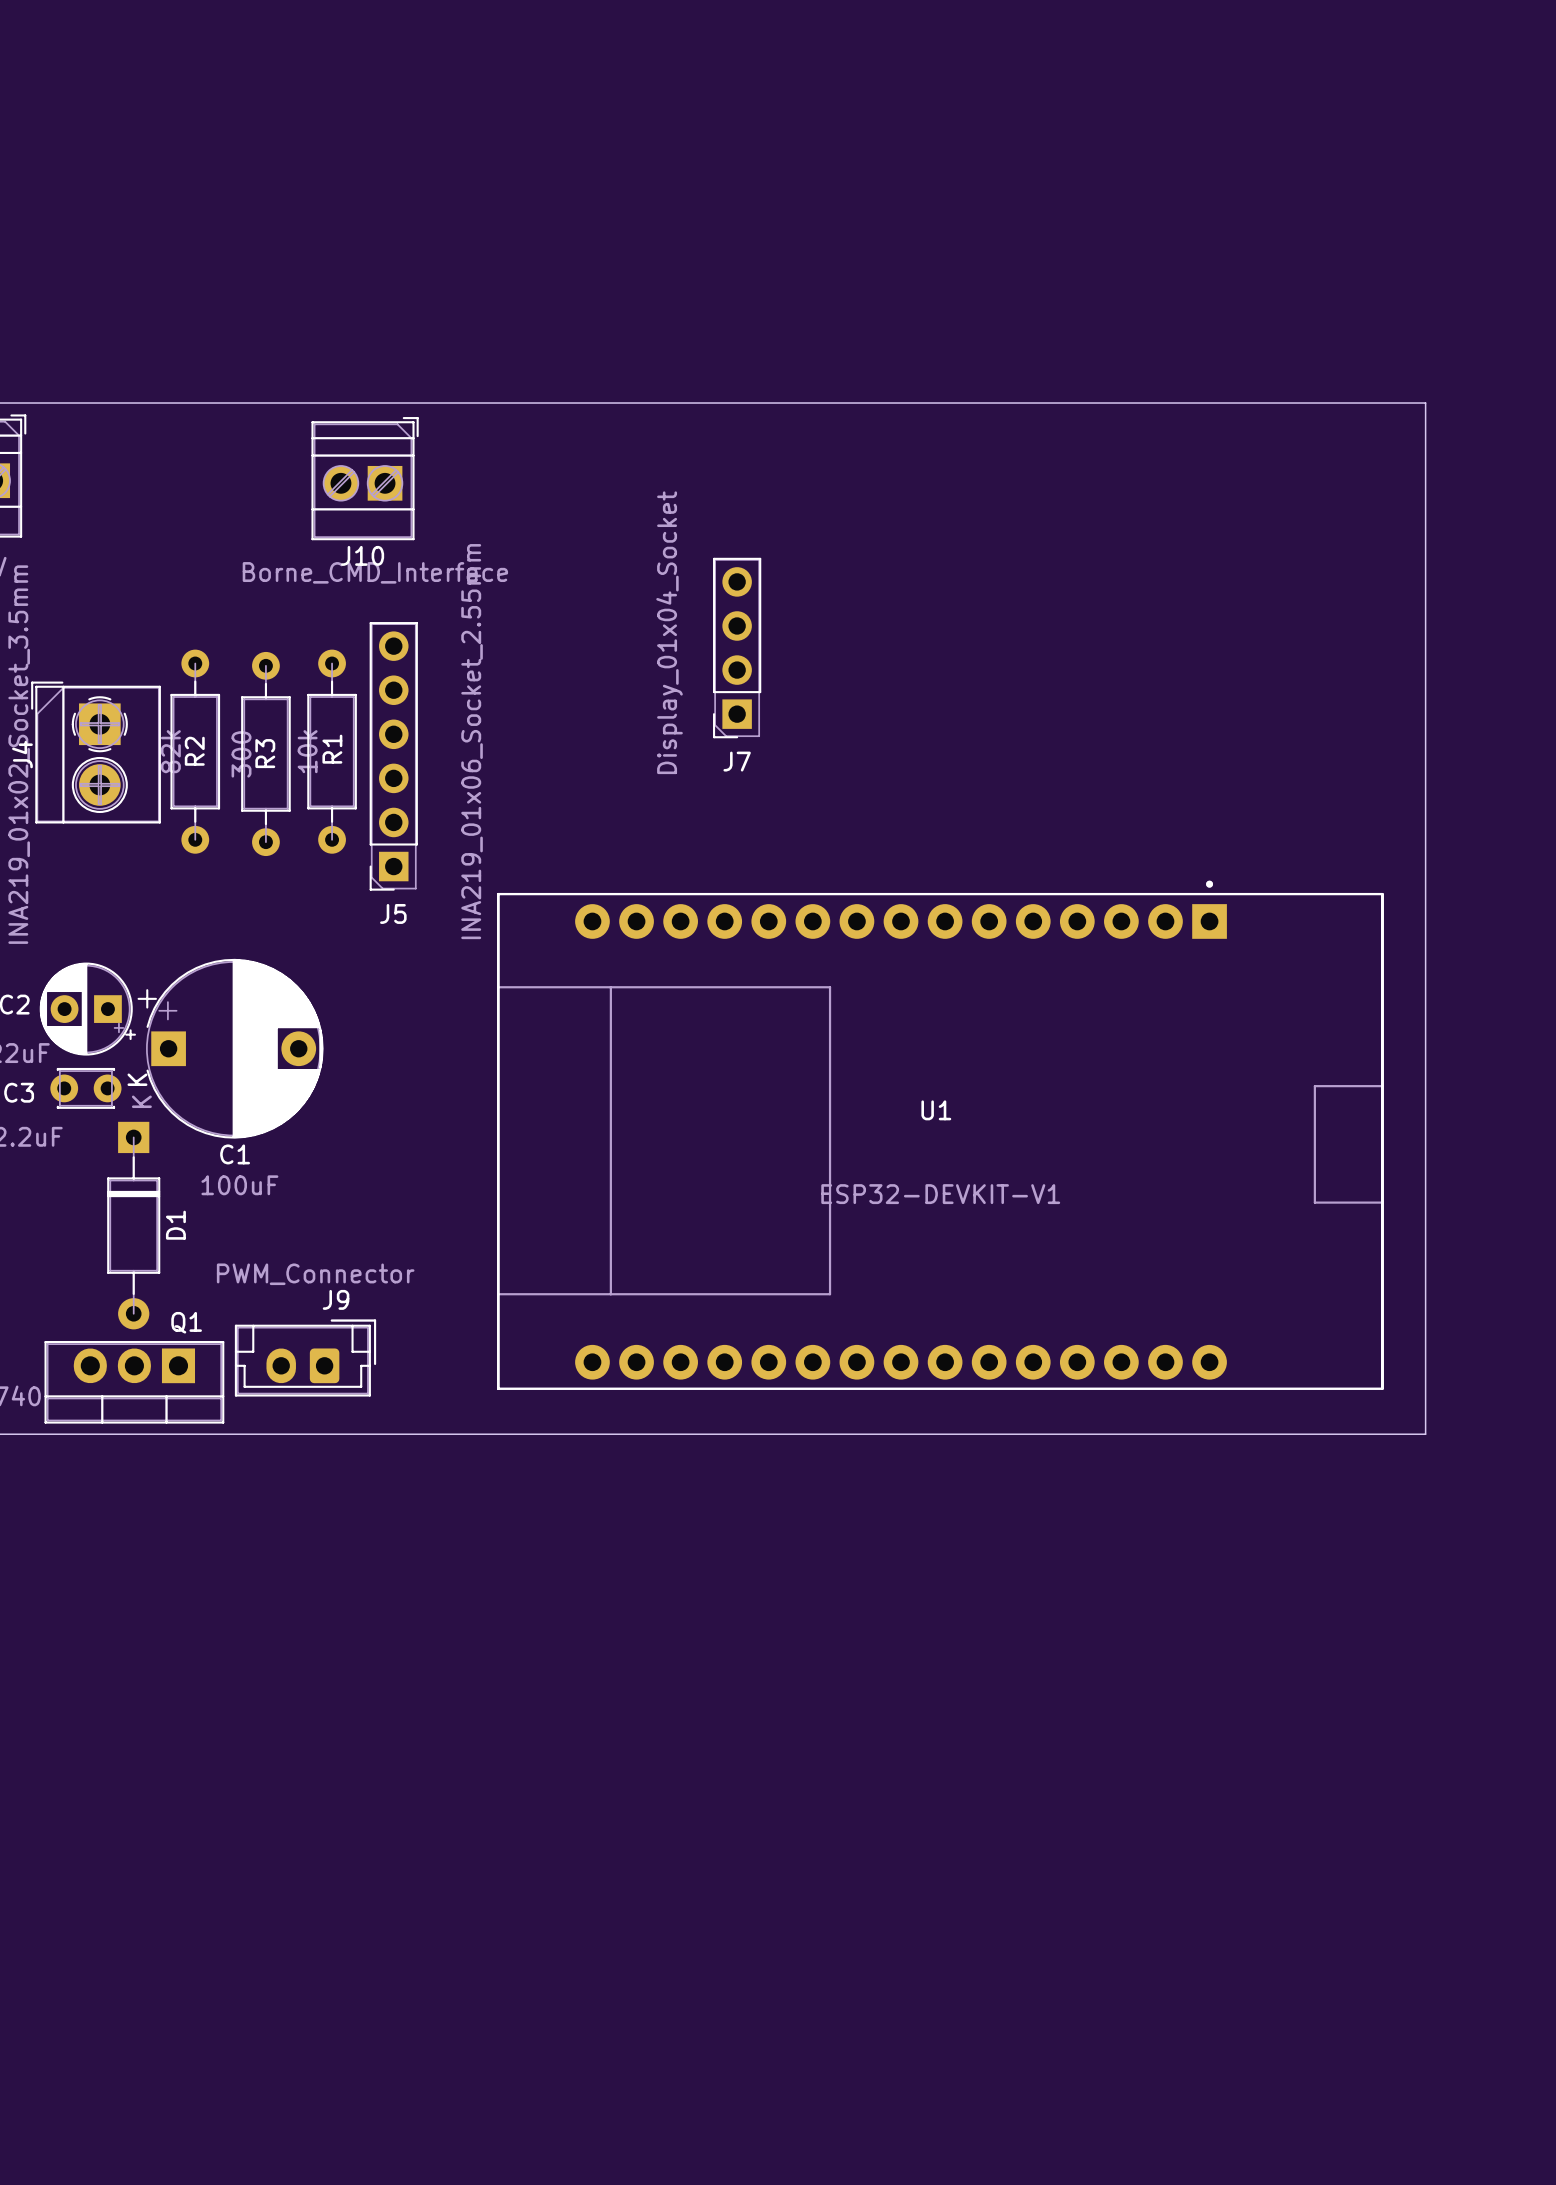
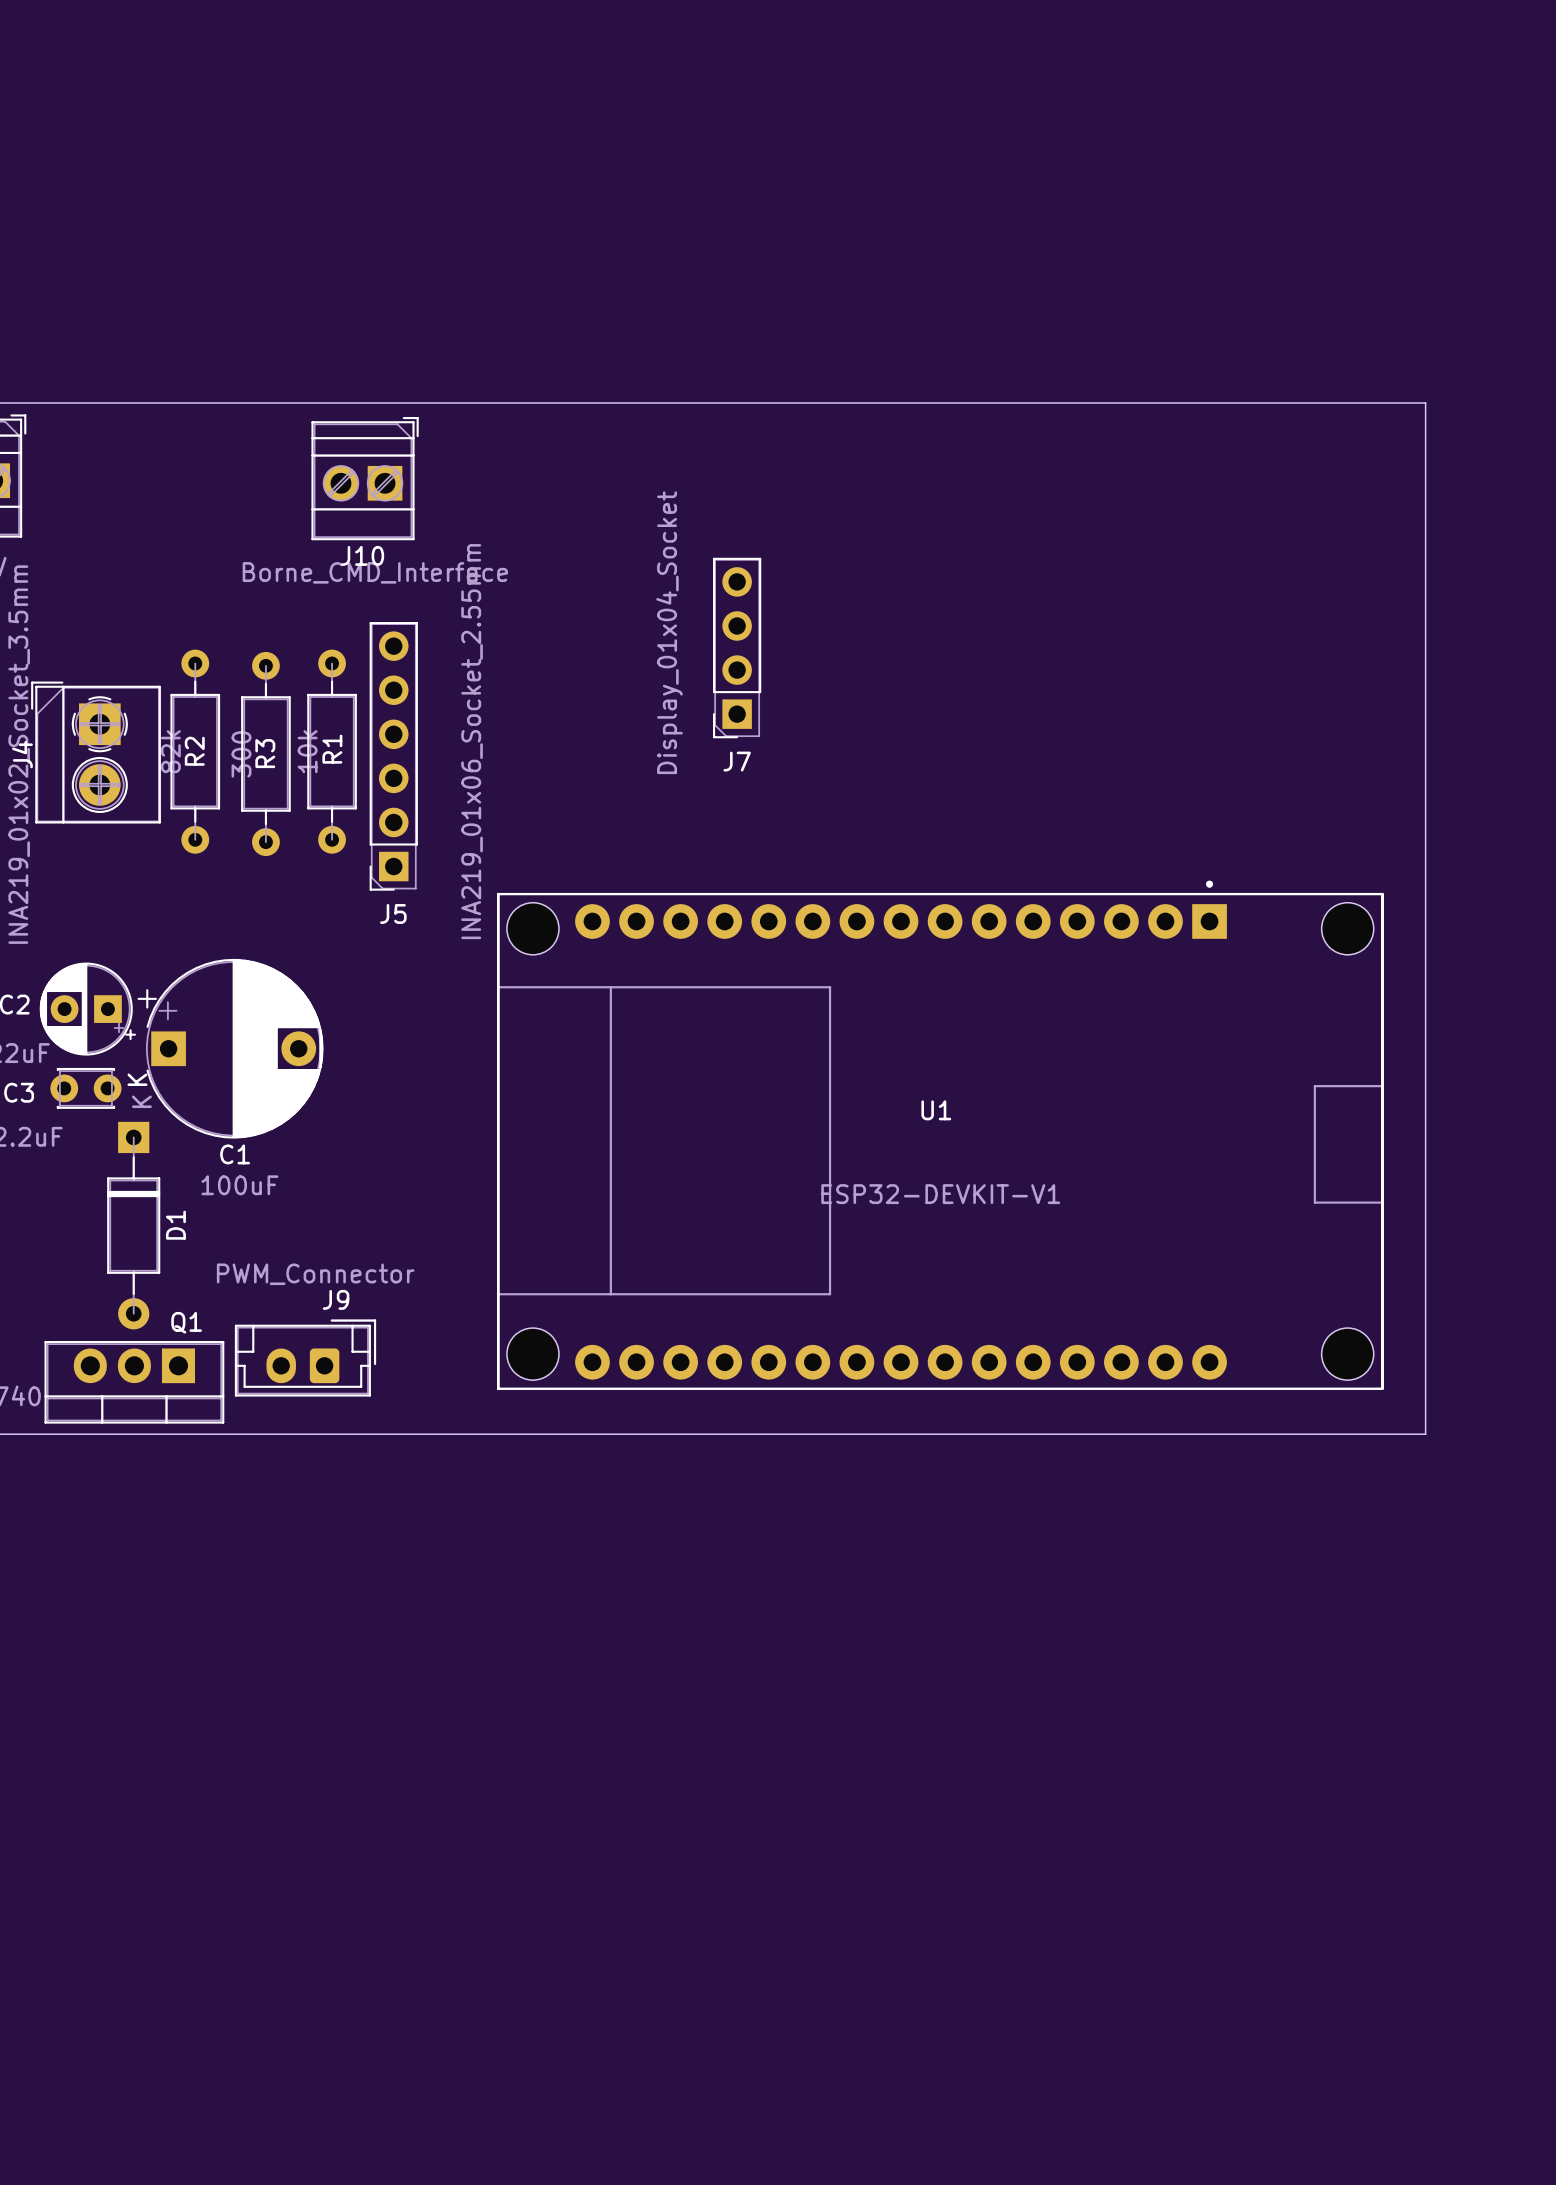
U1 footprint: [497, 880, 1384, 1390] -> [497, 880, 1384, 1390]

